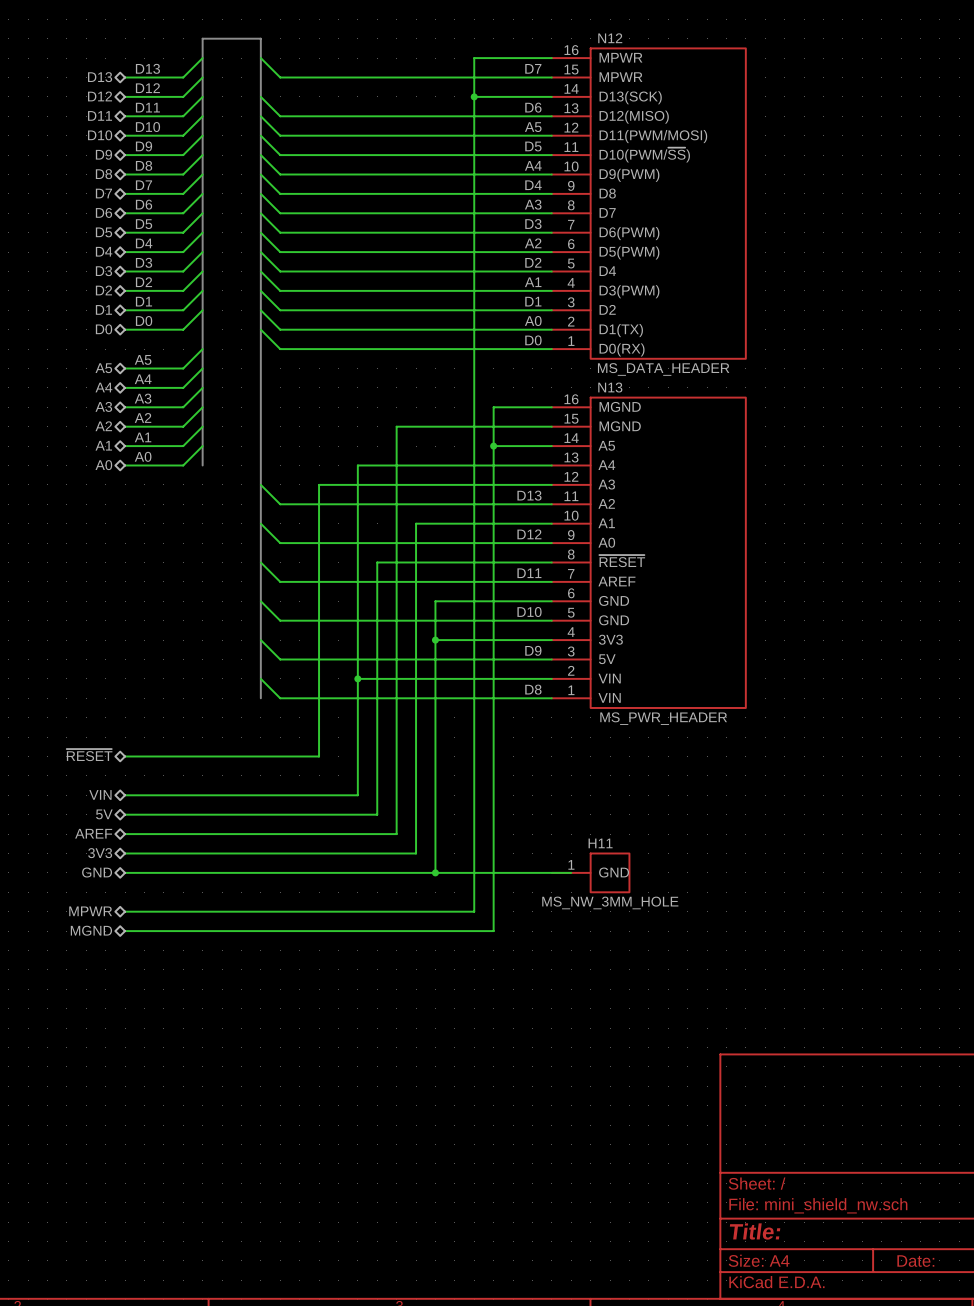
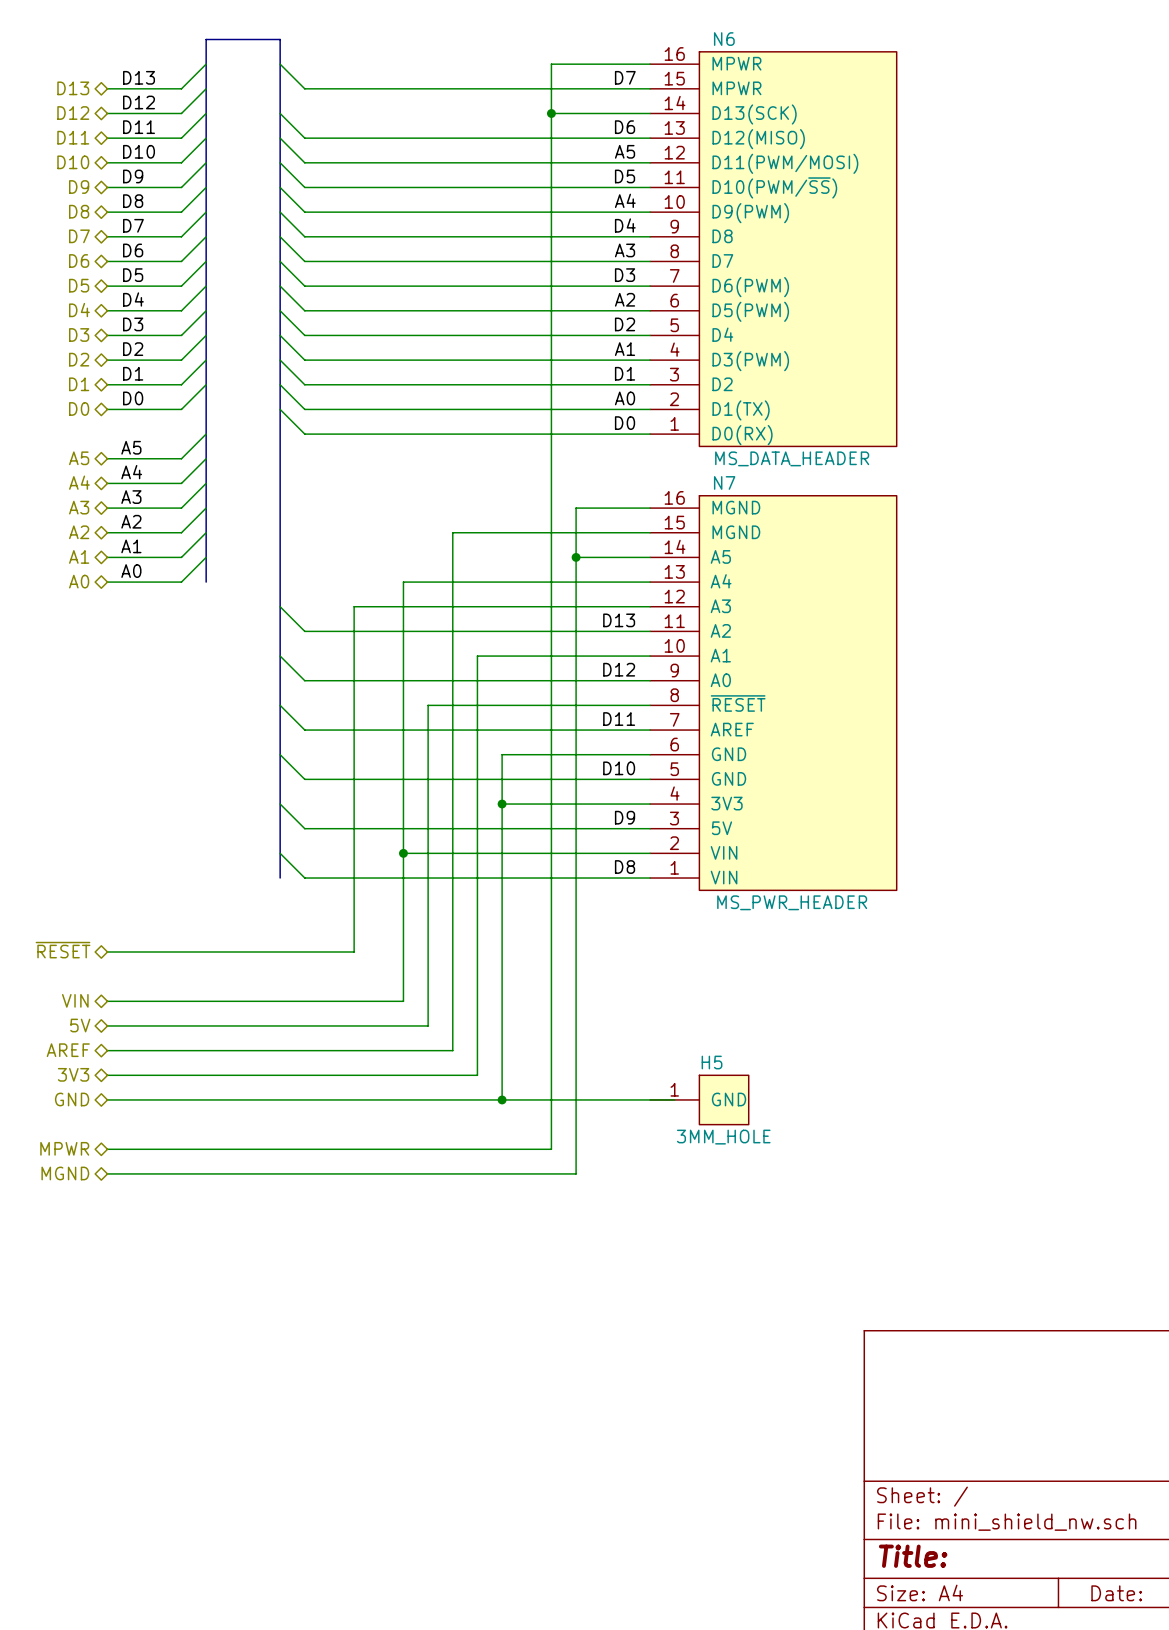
N12 name: N12 (610, 38) -> N6 (724, 39)
N13 name: N13 (610, 387) -> N7 (724, 482)
H11 name: H11 (600, 843) -> H5 (712, 1062)
H11 value: MS_NW_3MM_HOLE (610, 902) -> 3MM_HOLE (723, 1137)

